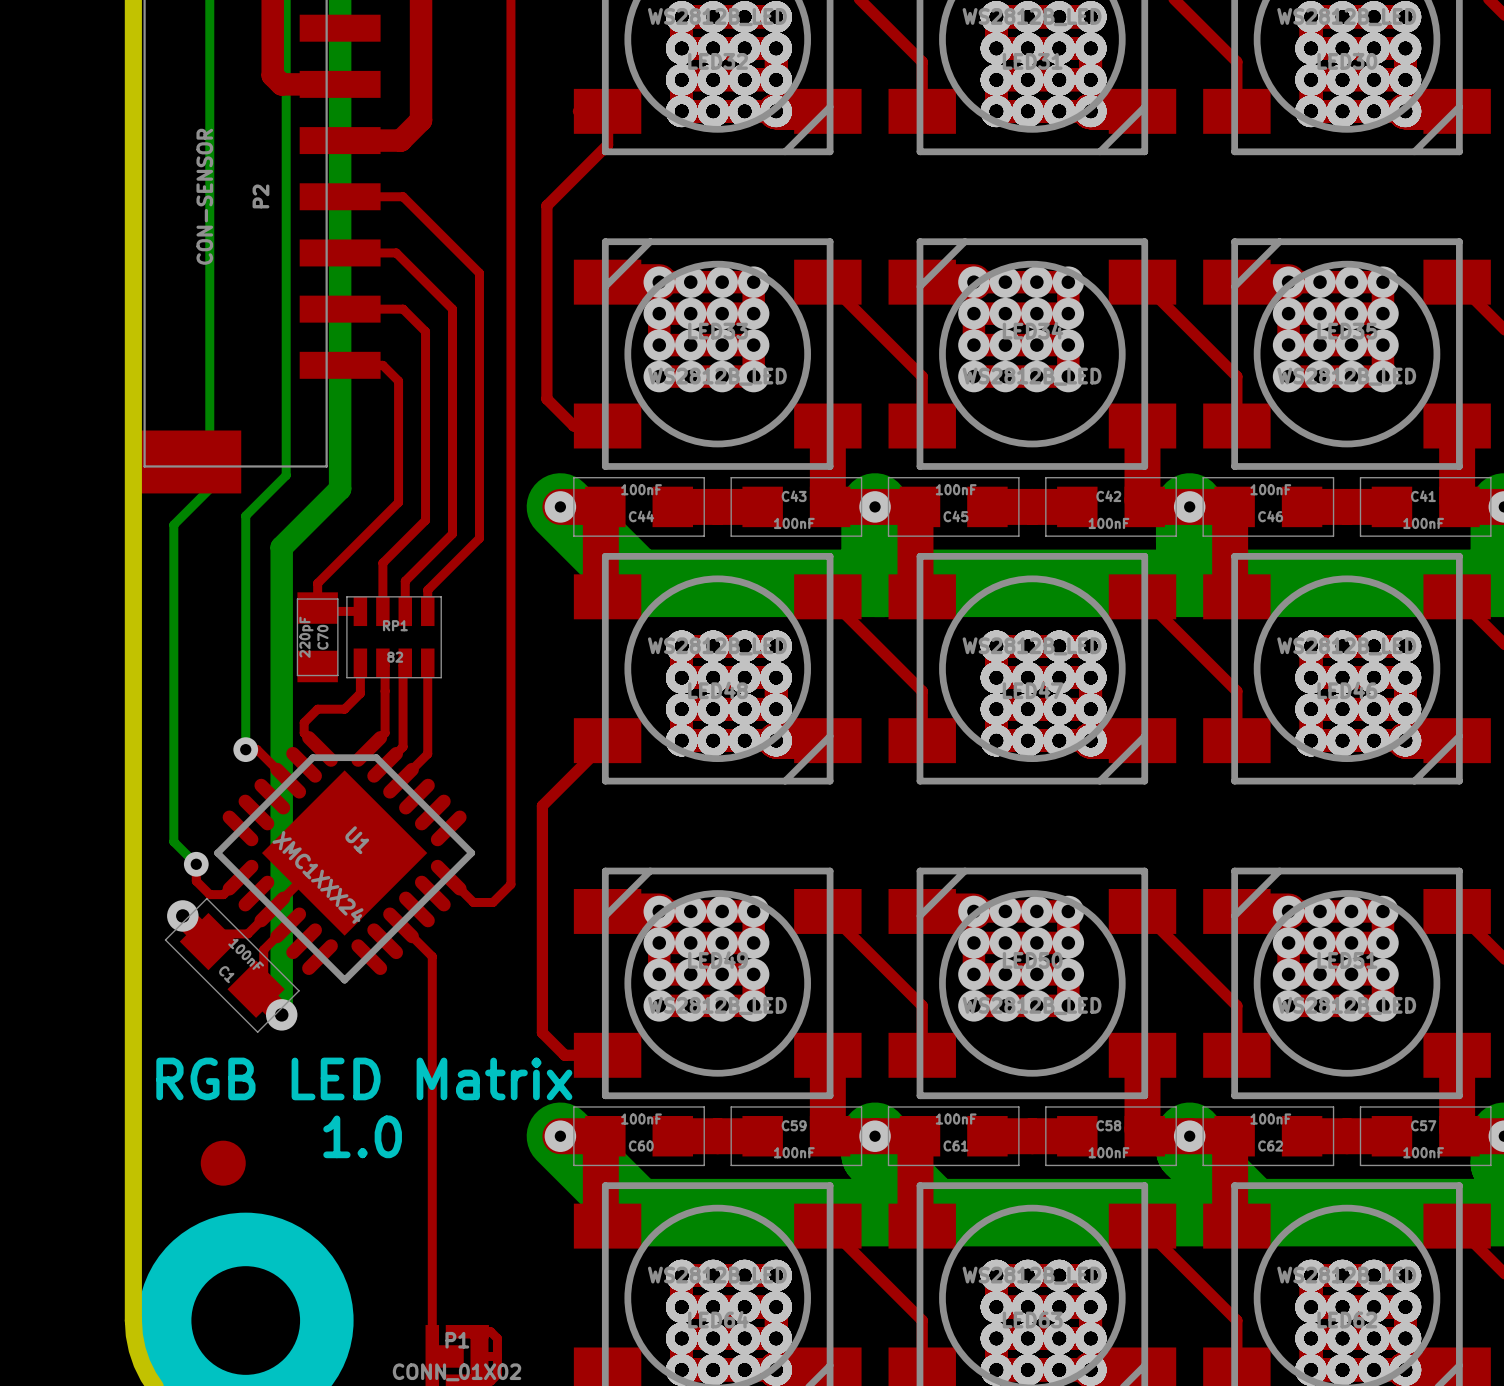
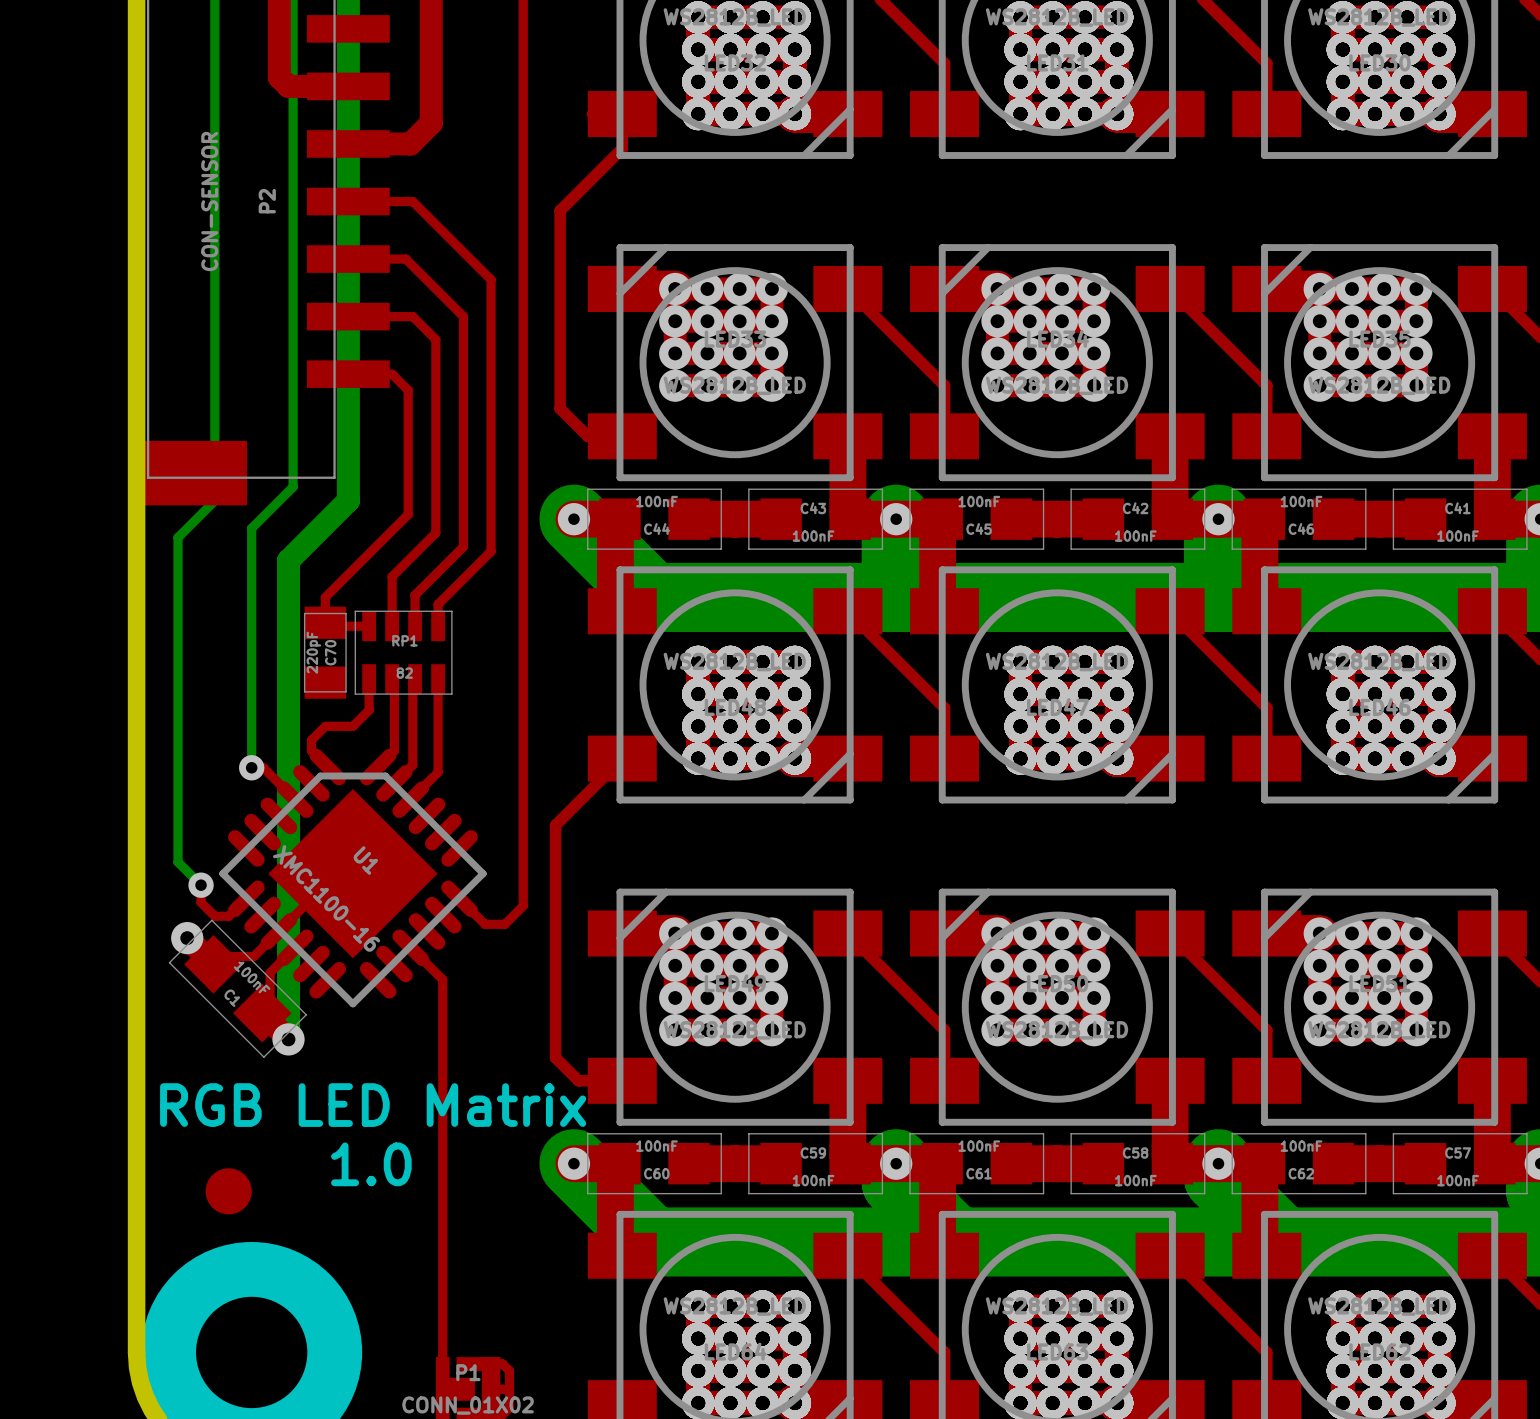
U1 value: XMC1XXX24 (317, 877) -> XMC1100-16 (326, 898)

